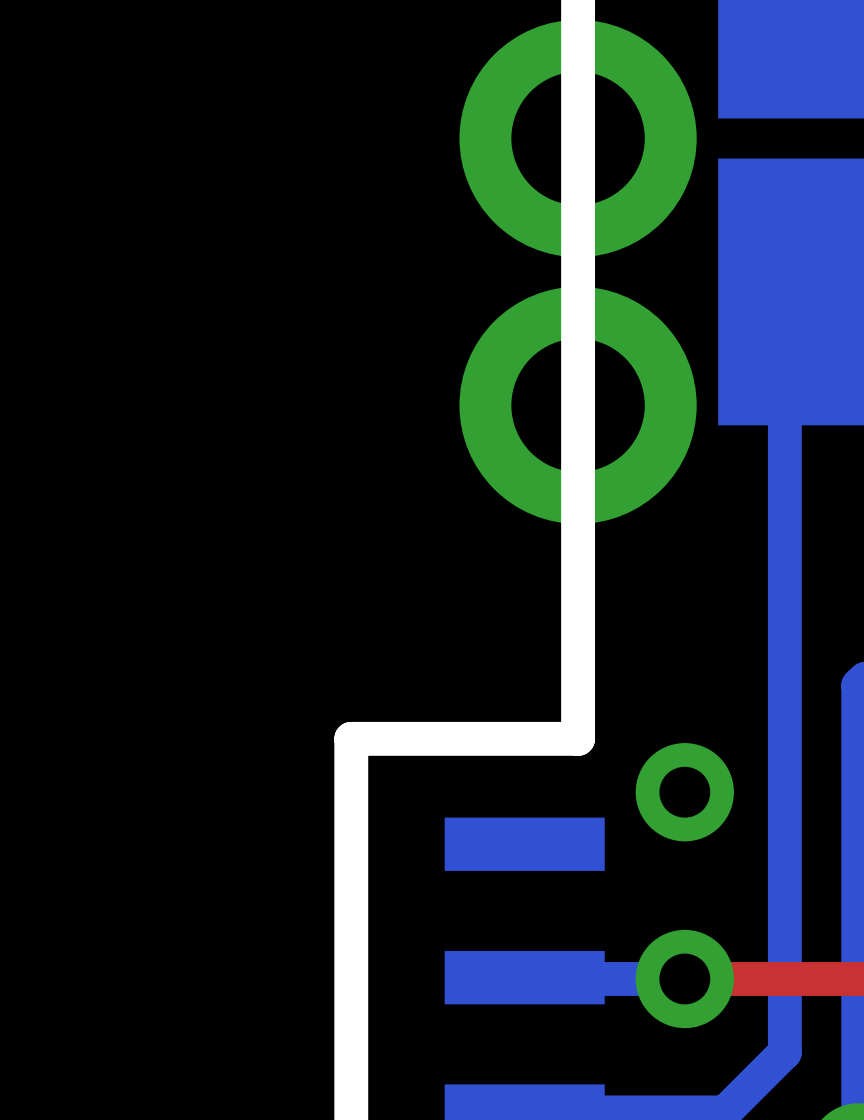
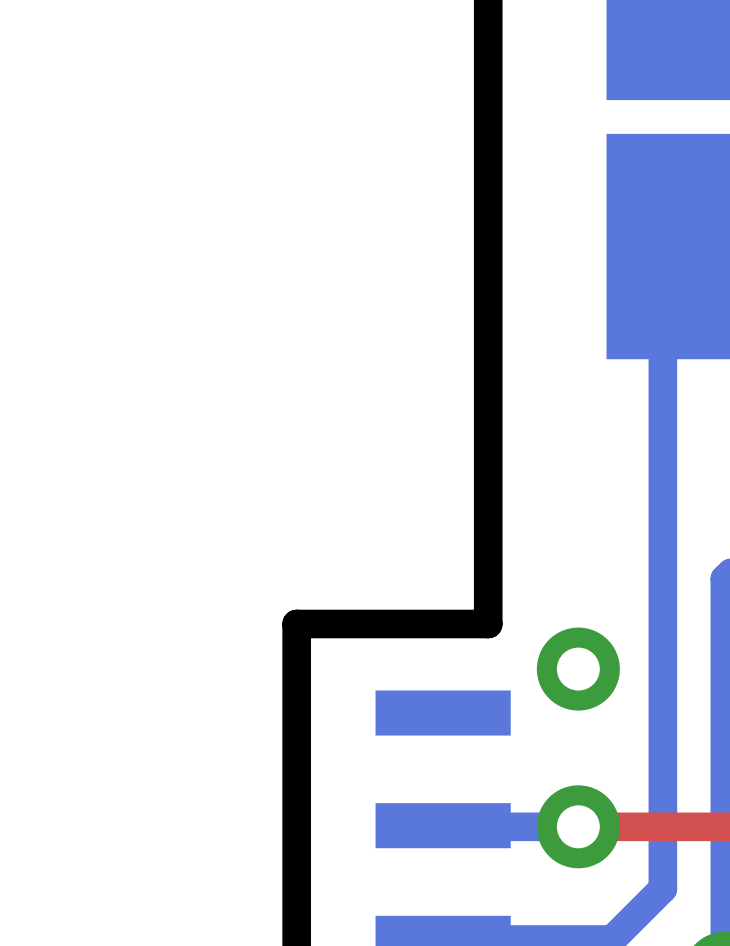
via: (578, 138) -> none
via: (578, 405) -> none

